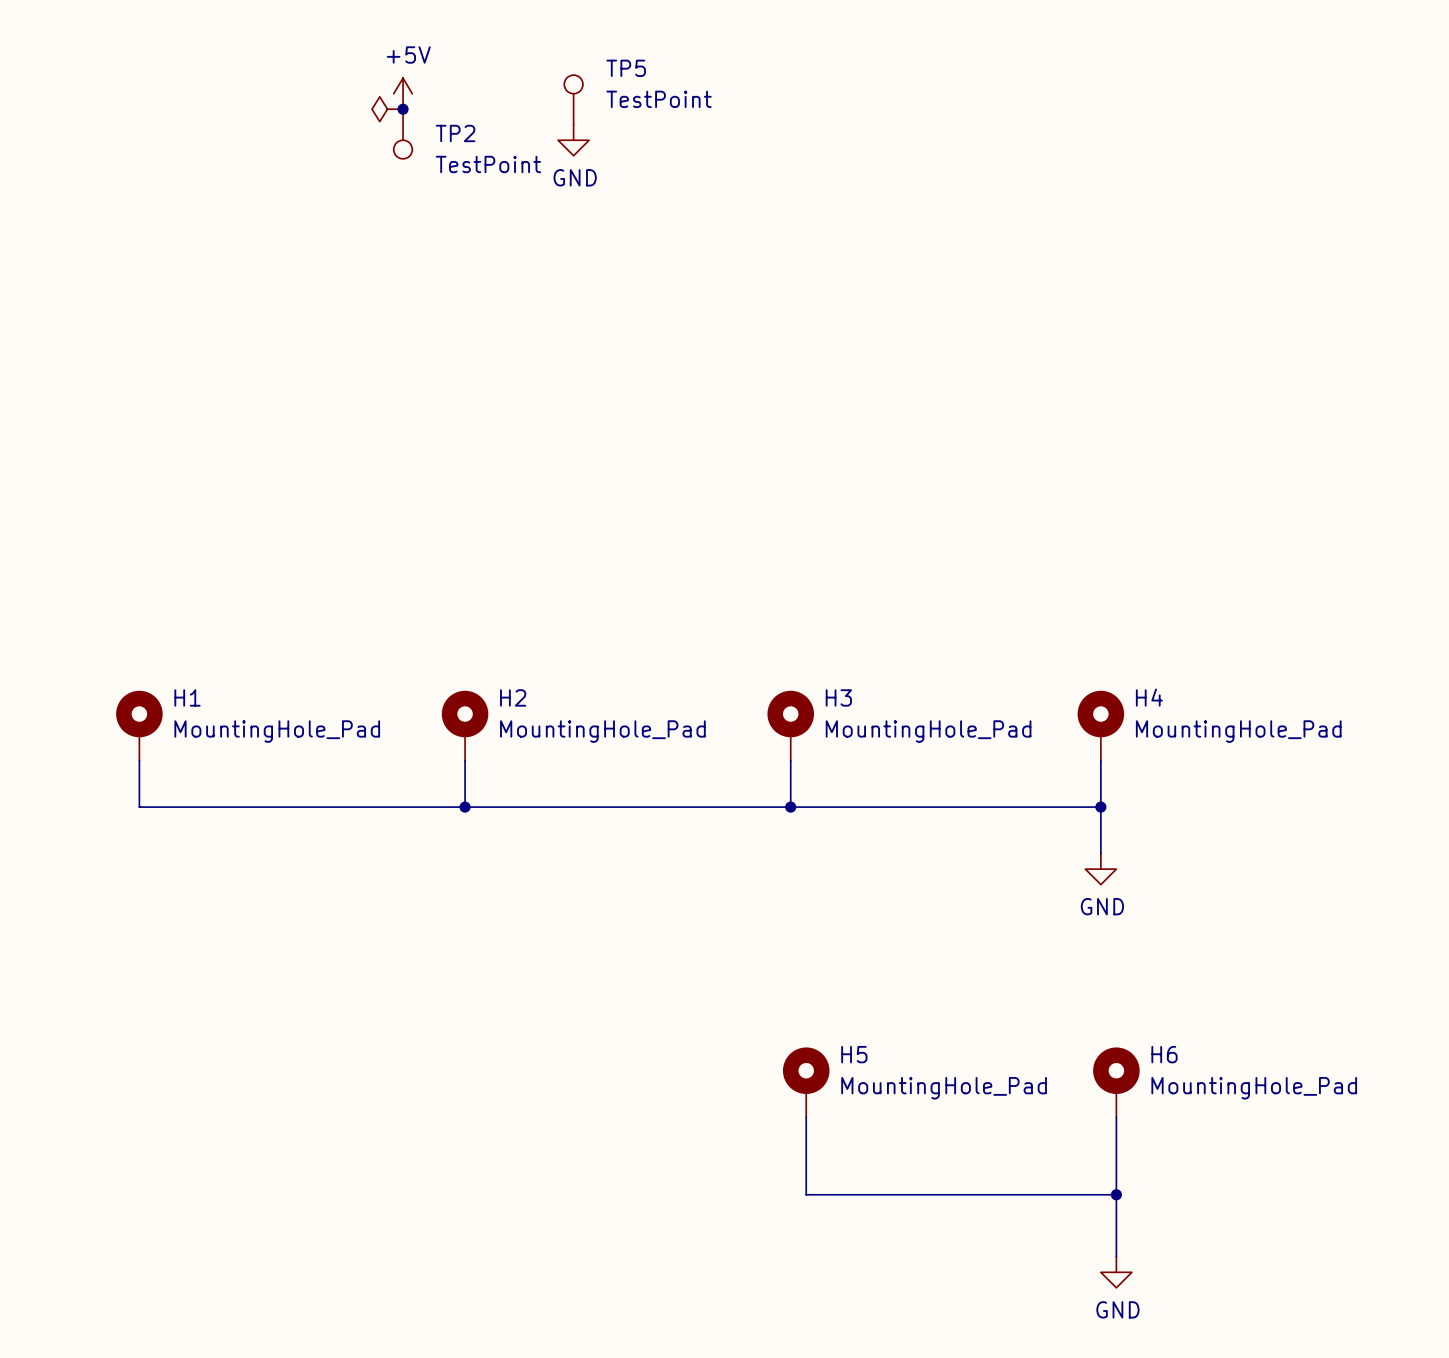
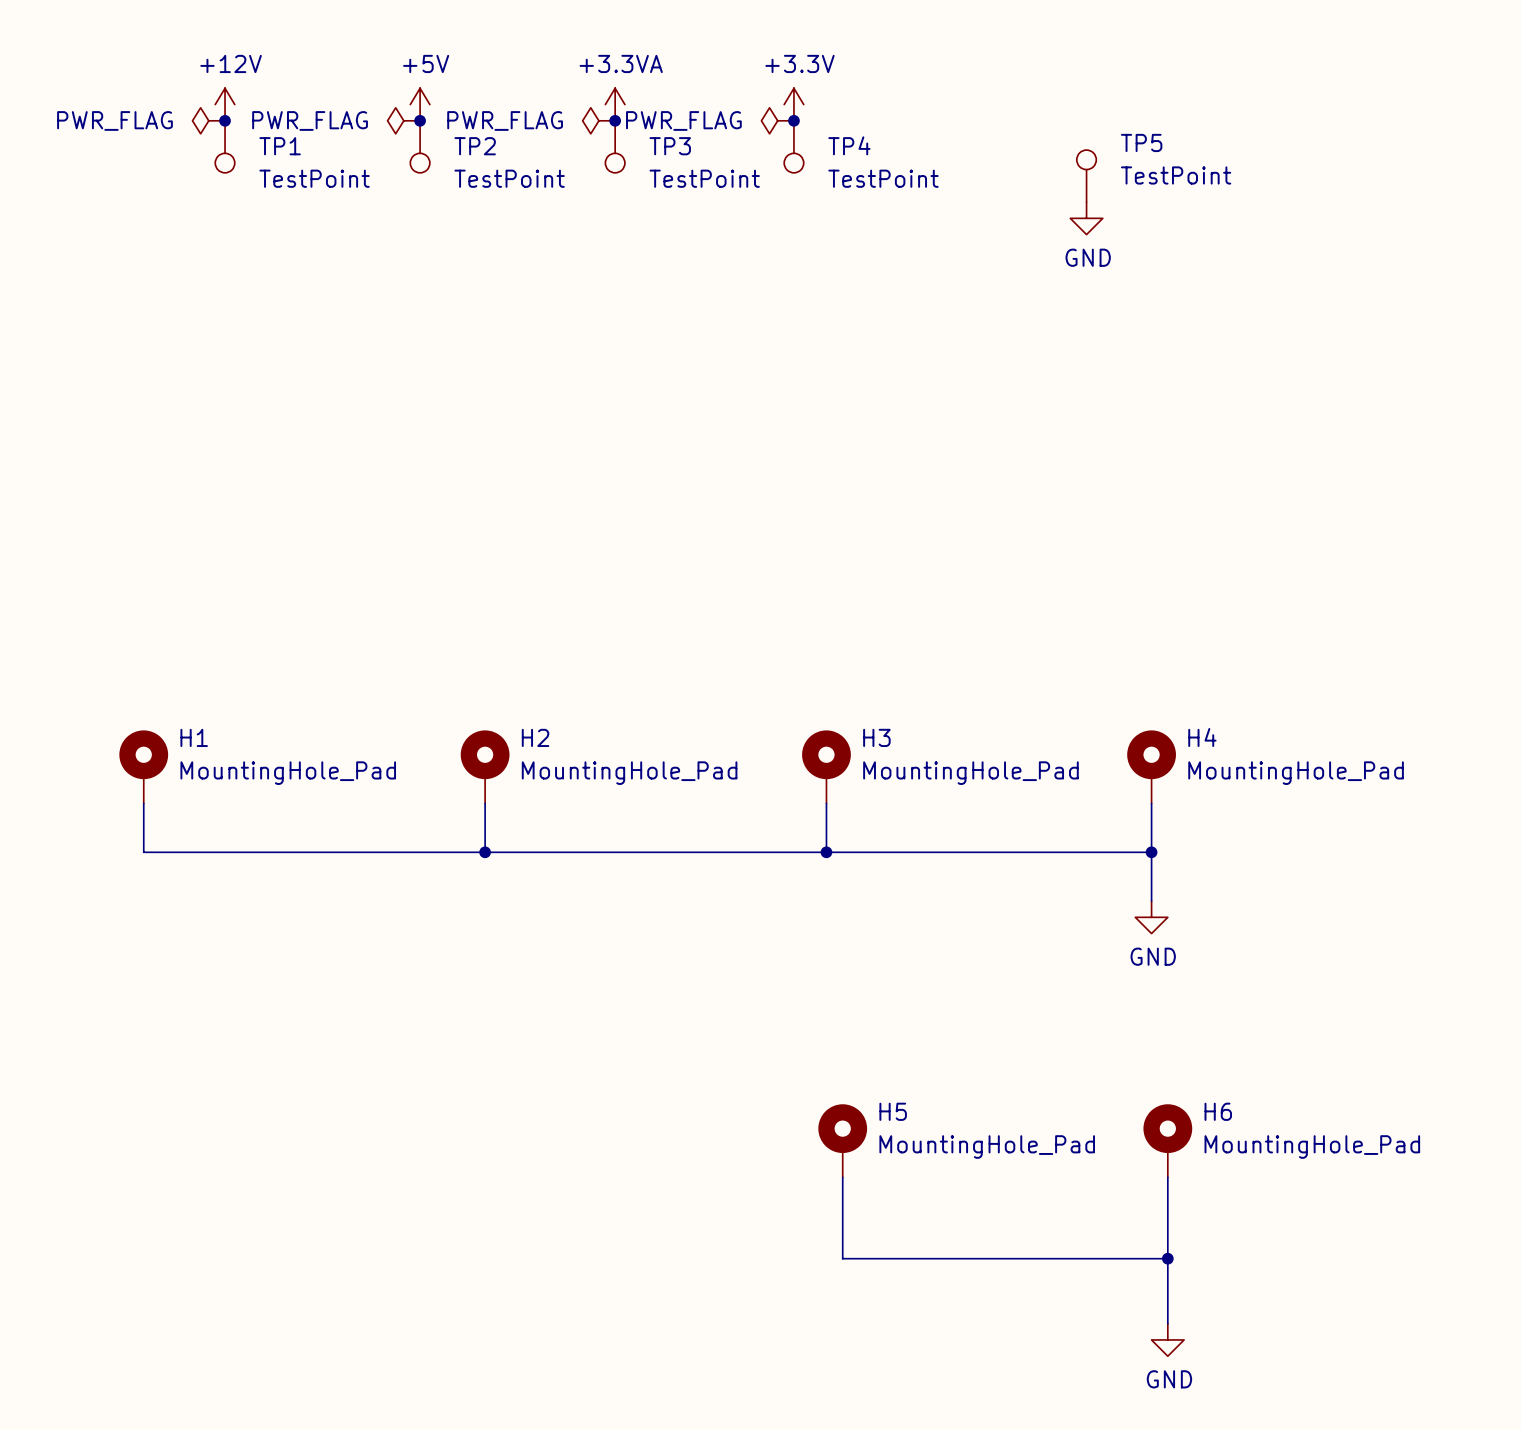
power symbol: none -> +12V (225, 104)
power symbol: none -> +3.3VA (615, 104)
power symbol: none -> +3.3V (793, 104)
TP5 position: (573, 99) -> (1086, 176)
power symbol: none -> PWR_FLAG (208, 120)
junction: none -> (225, 120)
power symbol text: none -> PWR_FLAG (310, 120)
power symbol: none -> PWR_FLAG (598, 120)
junction: none -> (615, 120)
power symbol: none -> PWR_FLAG (777, 120)
junction: none -> (793, 120)
TP1: none -> TestPoint (225, 146)
TP3: none -> TestPoint (615, 146)
TP4: none -> TestPoint (793, 146)
power symbol: GND (573, 140) -> none
power symbol: none -> GND (1086, 218)

